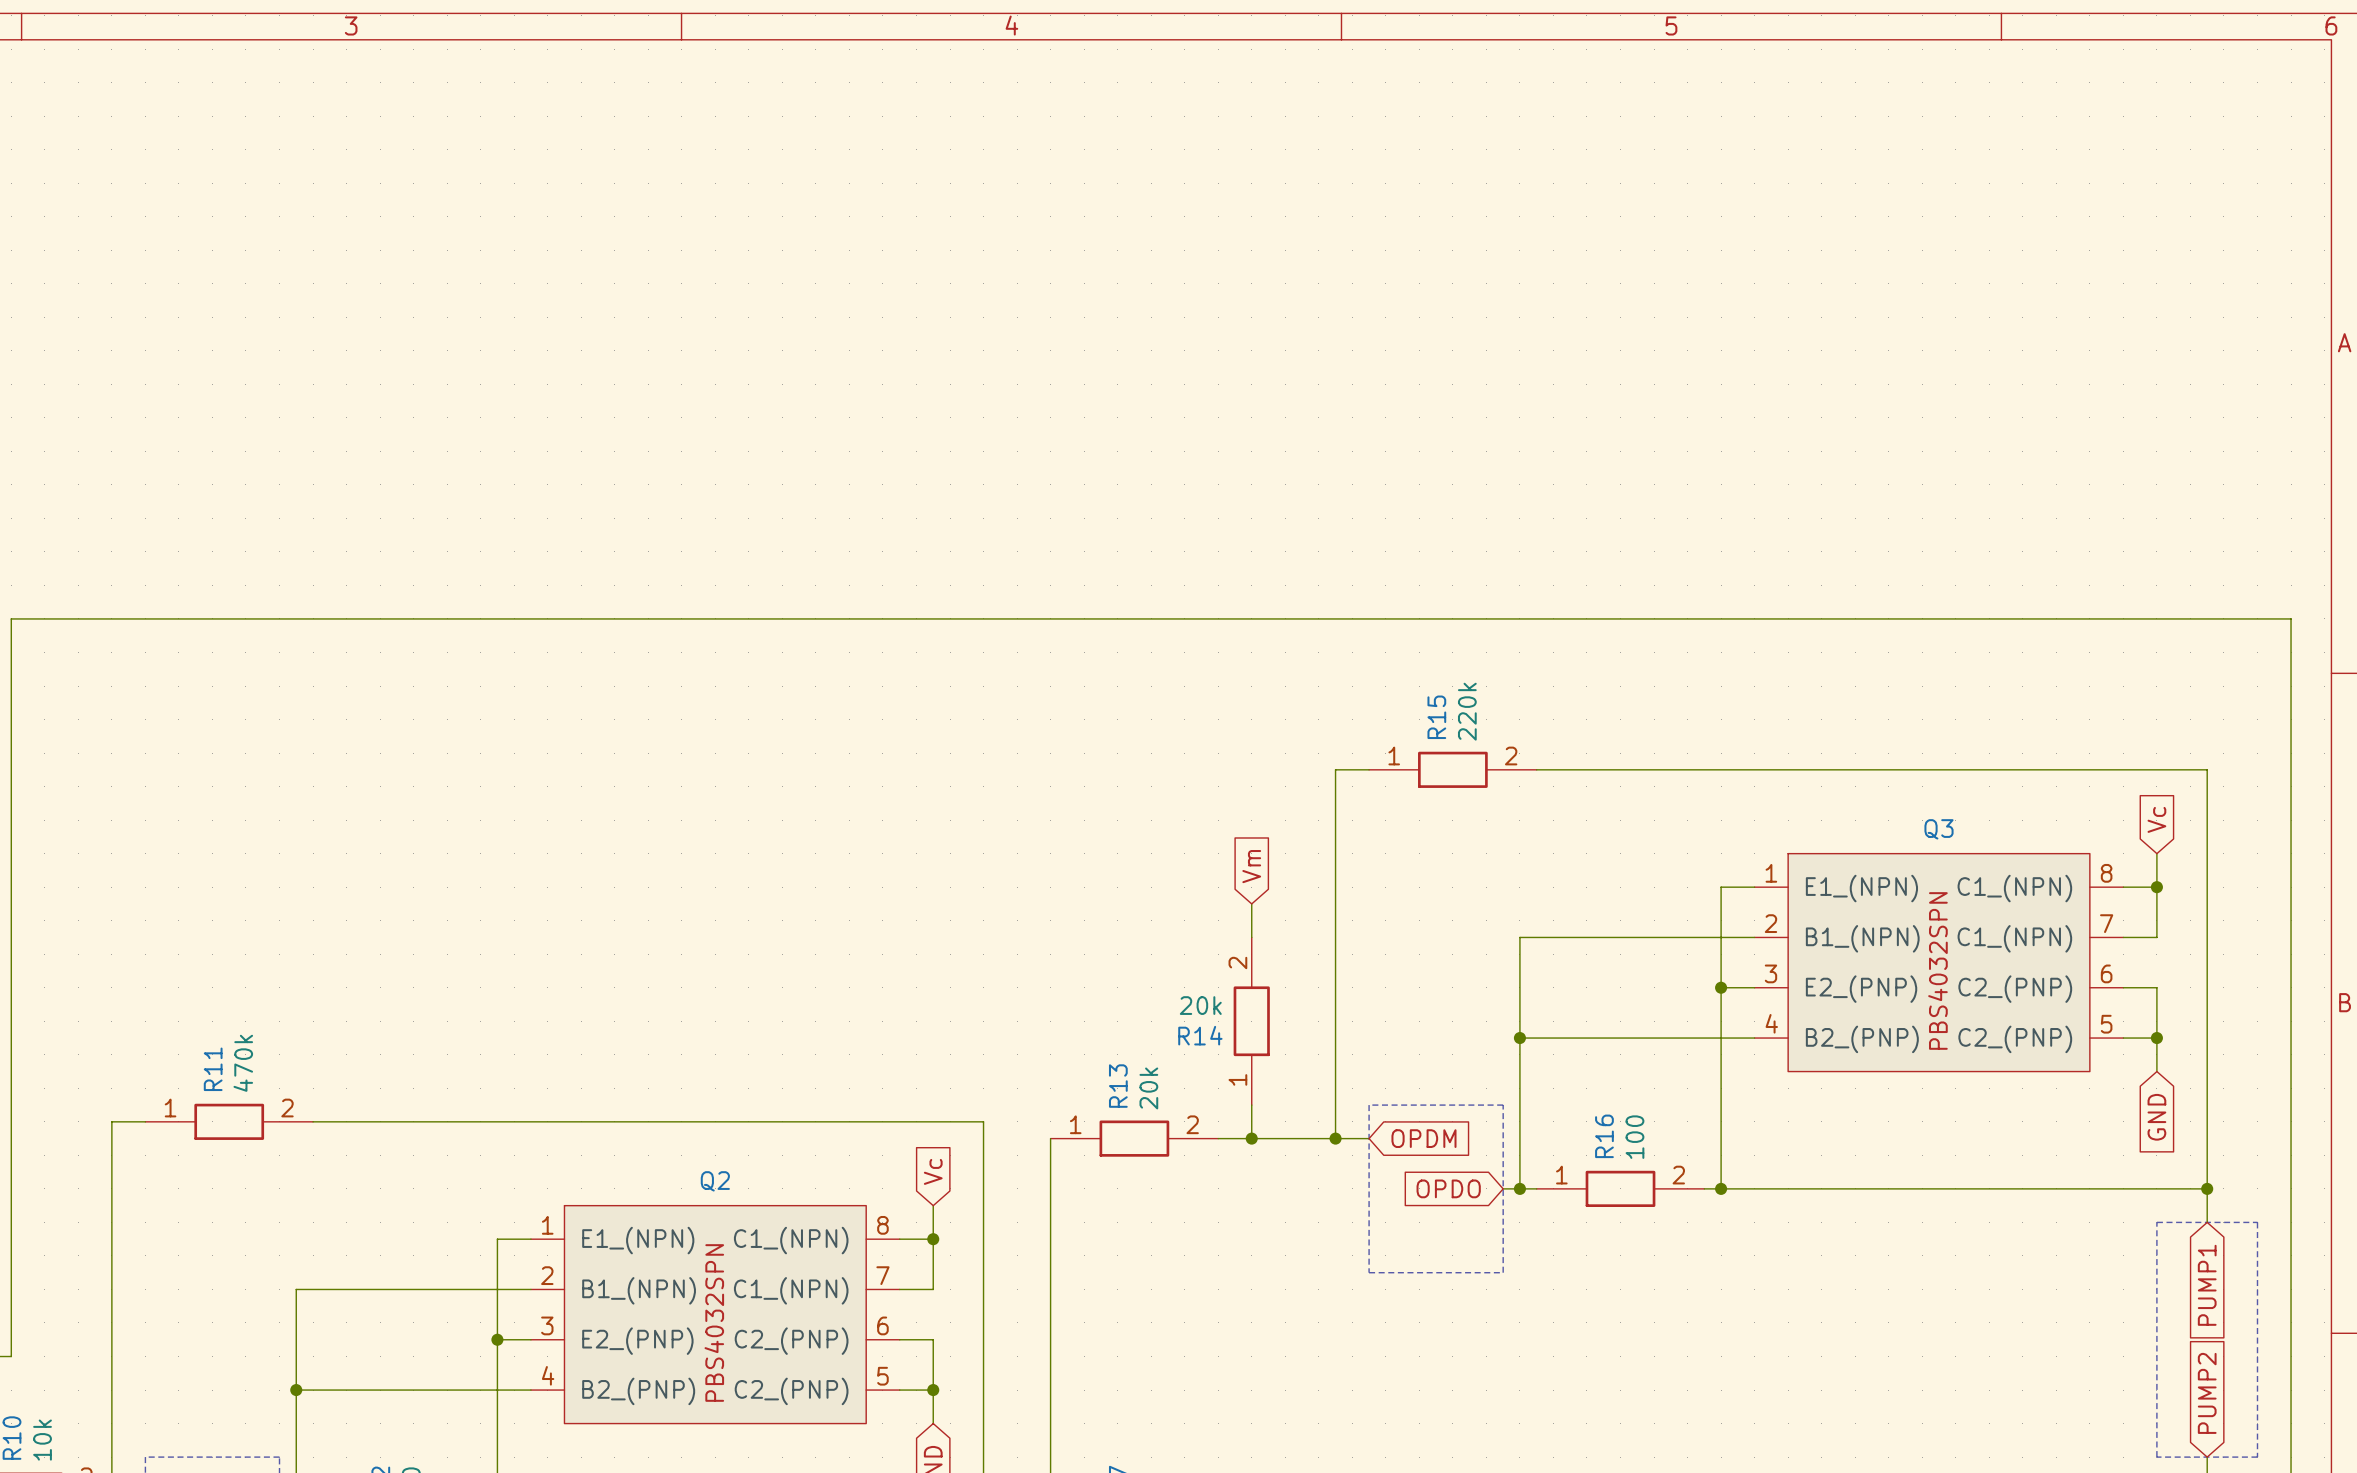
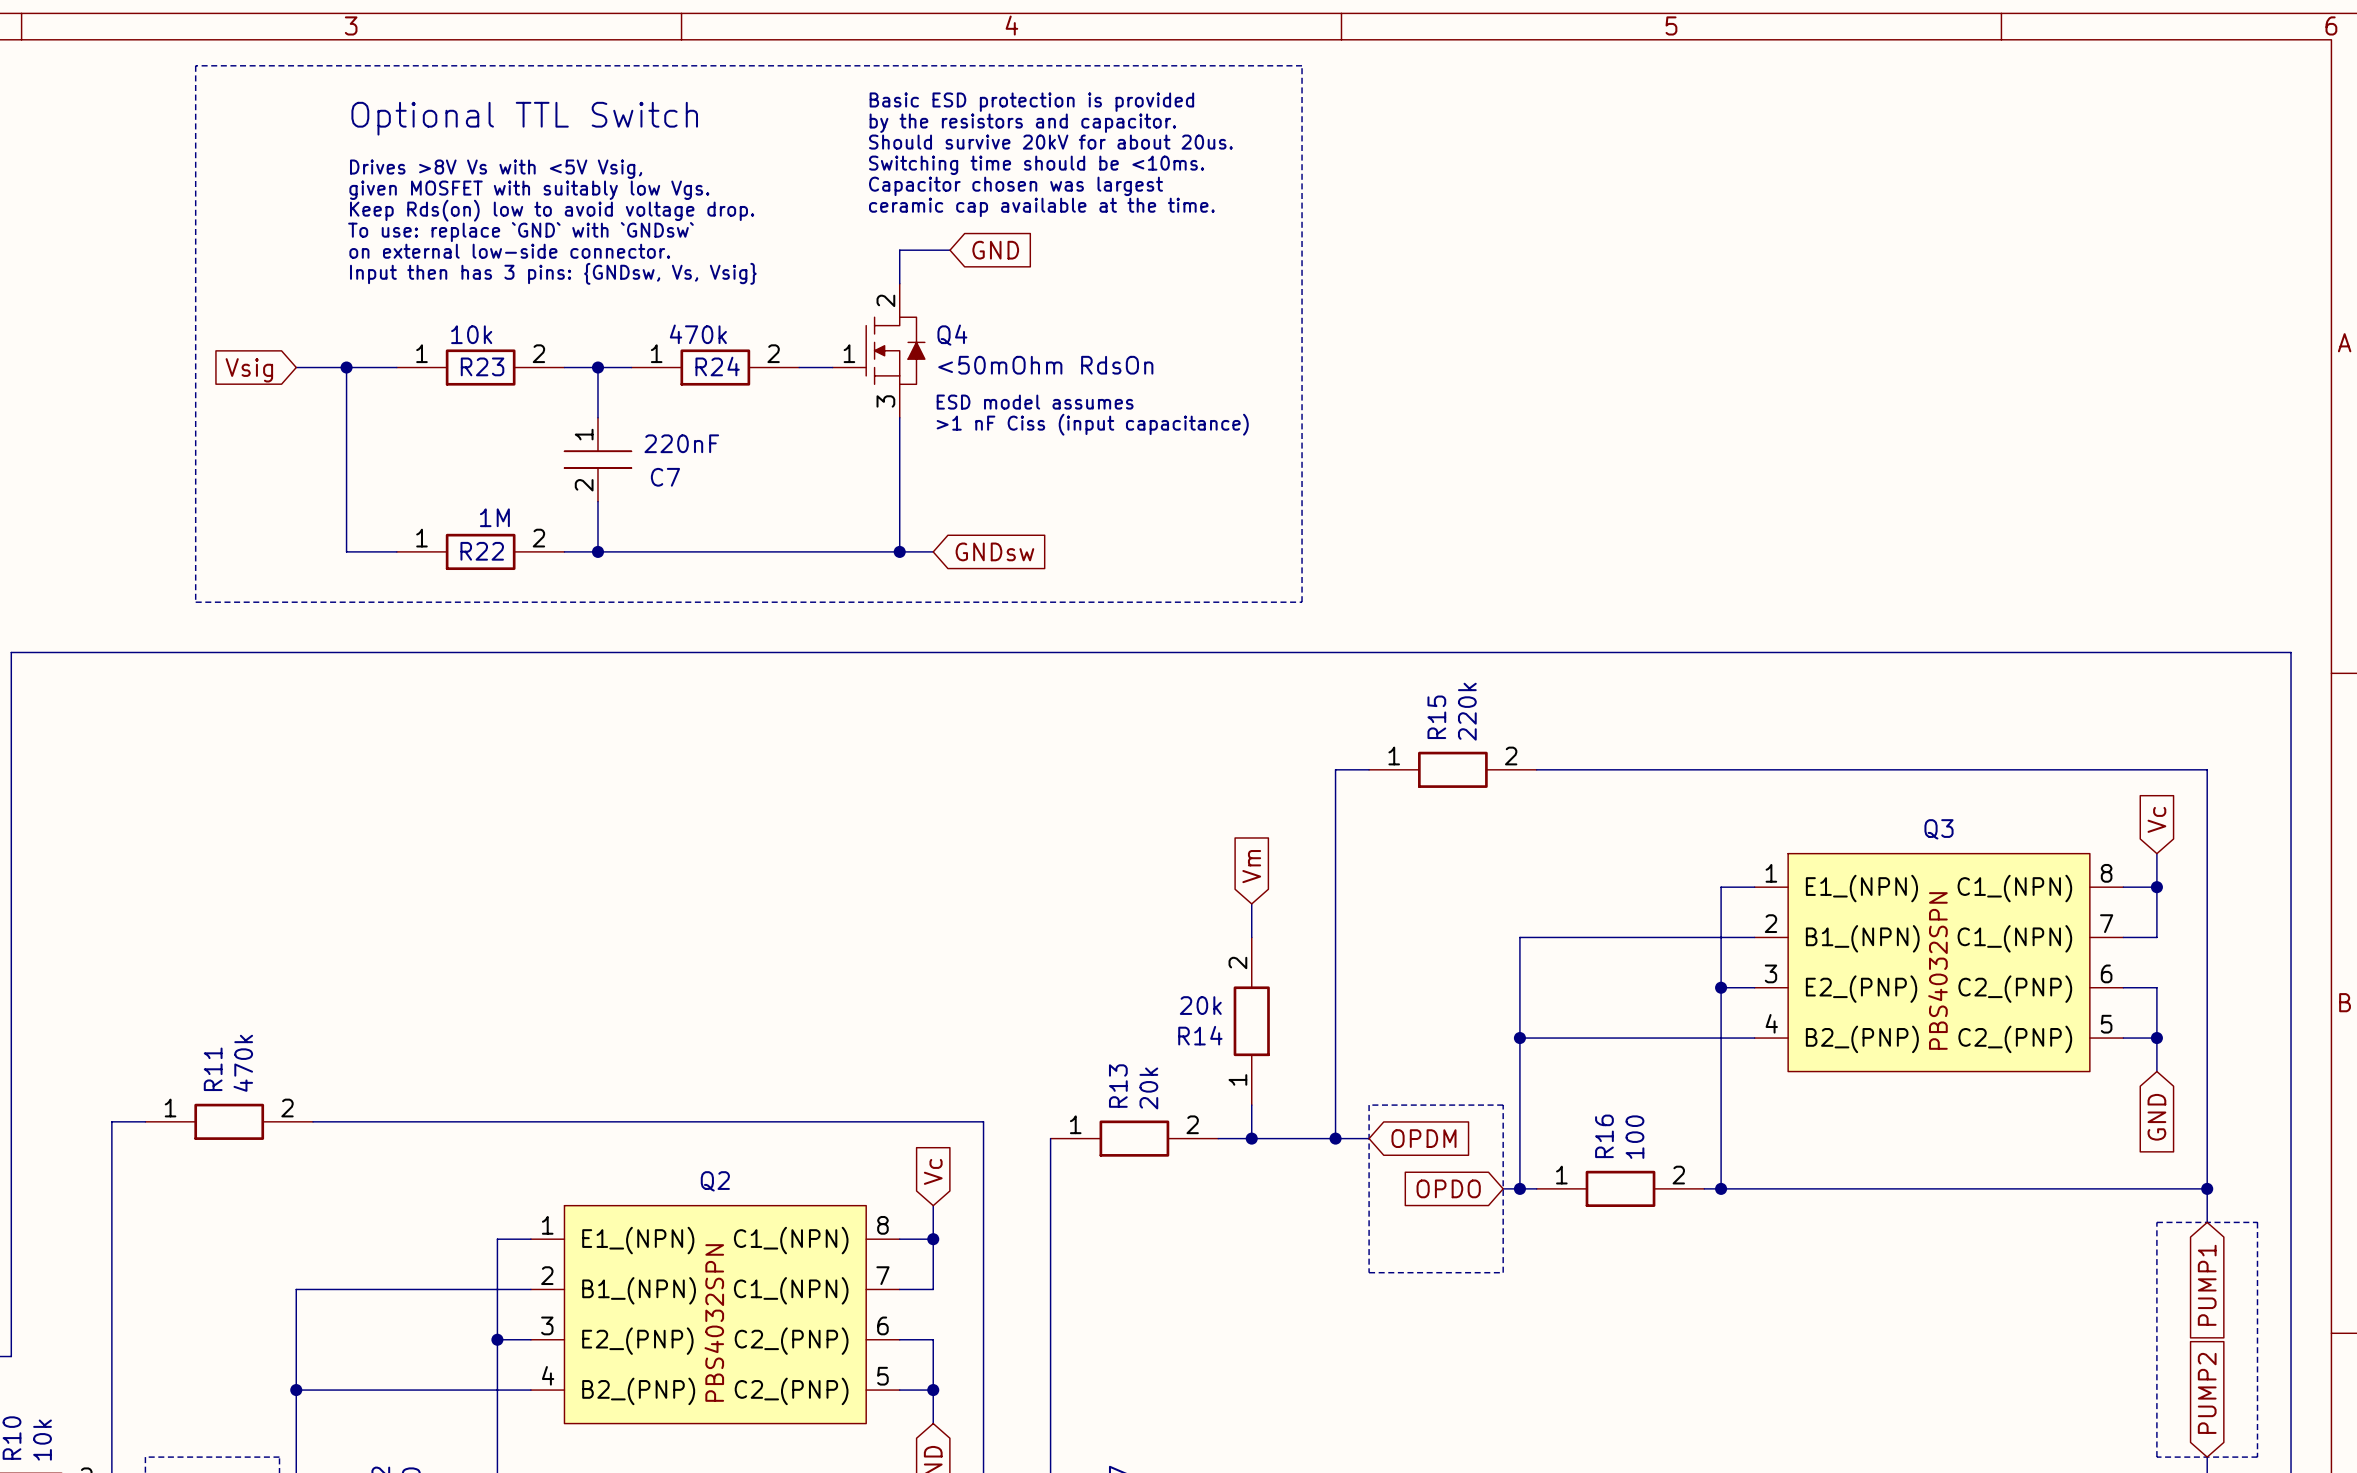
line: none -> (195, 65) (195, 602) (1302, 602) (1302, 65) (195, 65)
text: none -> Basic ESD protection is provided (1031, 102)
text: none -> Optional TTL Switch (524, 118)
text: none -> by the resistors and capacitor. (1022, 123)
text: none -> Should survive 20kV for about 20us. (1050, 142)
text: none -> Switching time should be <10ms. (1036, 165)
text: none -> Drives >8V Vs with <5V Vsig, (496, 169)
text: none -> Capacitor chosen was largest (1016, 186)
text: none -> given MOSFET with suitably low Vgs. (529, 190)
text: none -> ceramic cap available at the time. (1041, 207)
text: none -> Keep Rds(on) low to avoid voltage drop. (552, 210)
text: none -> To use: replace `GND` with `GNDsw` (520, 232)
wire: none -> (950, 250) (899, 250) (899, 283)
global label: none -> GND (995, 250)
text: none -> on external low-side connector. (509, 251)
text: none -> Input then has 3 pins: {GNDsw, Vs, Vsig} (553, 273)
Q4: none -> <50mOhm RdsOn (878, 350)
wire: none -> (296, 367) (396, 367)
wire: none -> (346, 367) (346, 551) (396, 551)
junction: none -> (346, 367)
R23: none -> 10k (480, 367)
wire: none -> (564, 367) (631, 367)
wire: none -> (597, 367) (597, 417)
junction: none -> (597, 367)
R24: none -> 470k (715, 367)
wire: none -> (799, 367) (832, 367)
global label: none -> Vsig (249, 370)
text: none -> ESD model assumes (1035, 402)
wire: none -> (899, 417) (899, 551)
text: none -> >1 nF Ciss (input capacitance) (1092, 424)
C7: none -> 220nF (597, 459)
wire: none -> (597, 501) (597, 551)
R22: none -> 1M (480, 551)
wire: none -> (564, 551) (933, 551)
junction: none -> (597, 551)
junction: none -> (899, 551)
global label: none -> GNDsw (994, 551)
wire: (11, 652) (11, 618) (2291, 618) (2291, 652) -> (11, 652) (2291, 652)

